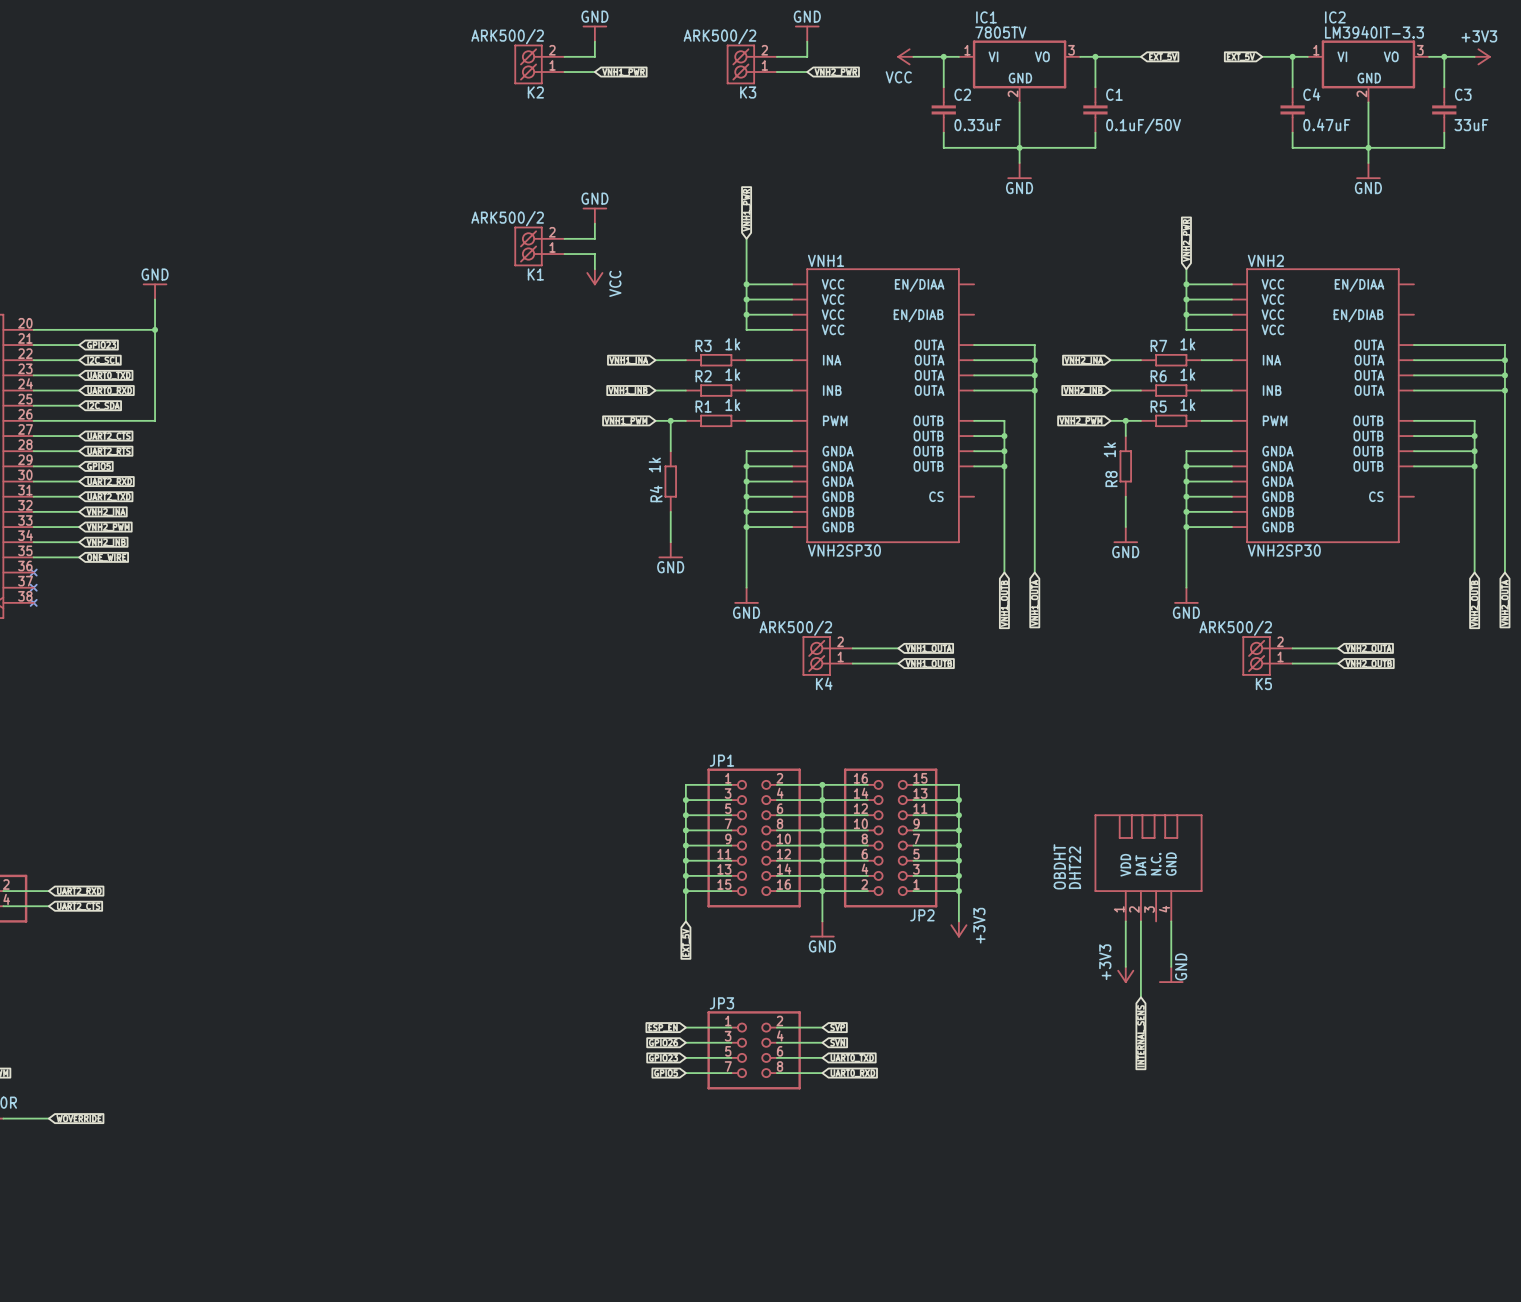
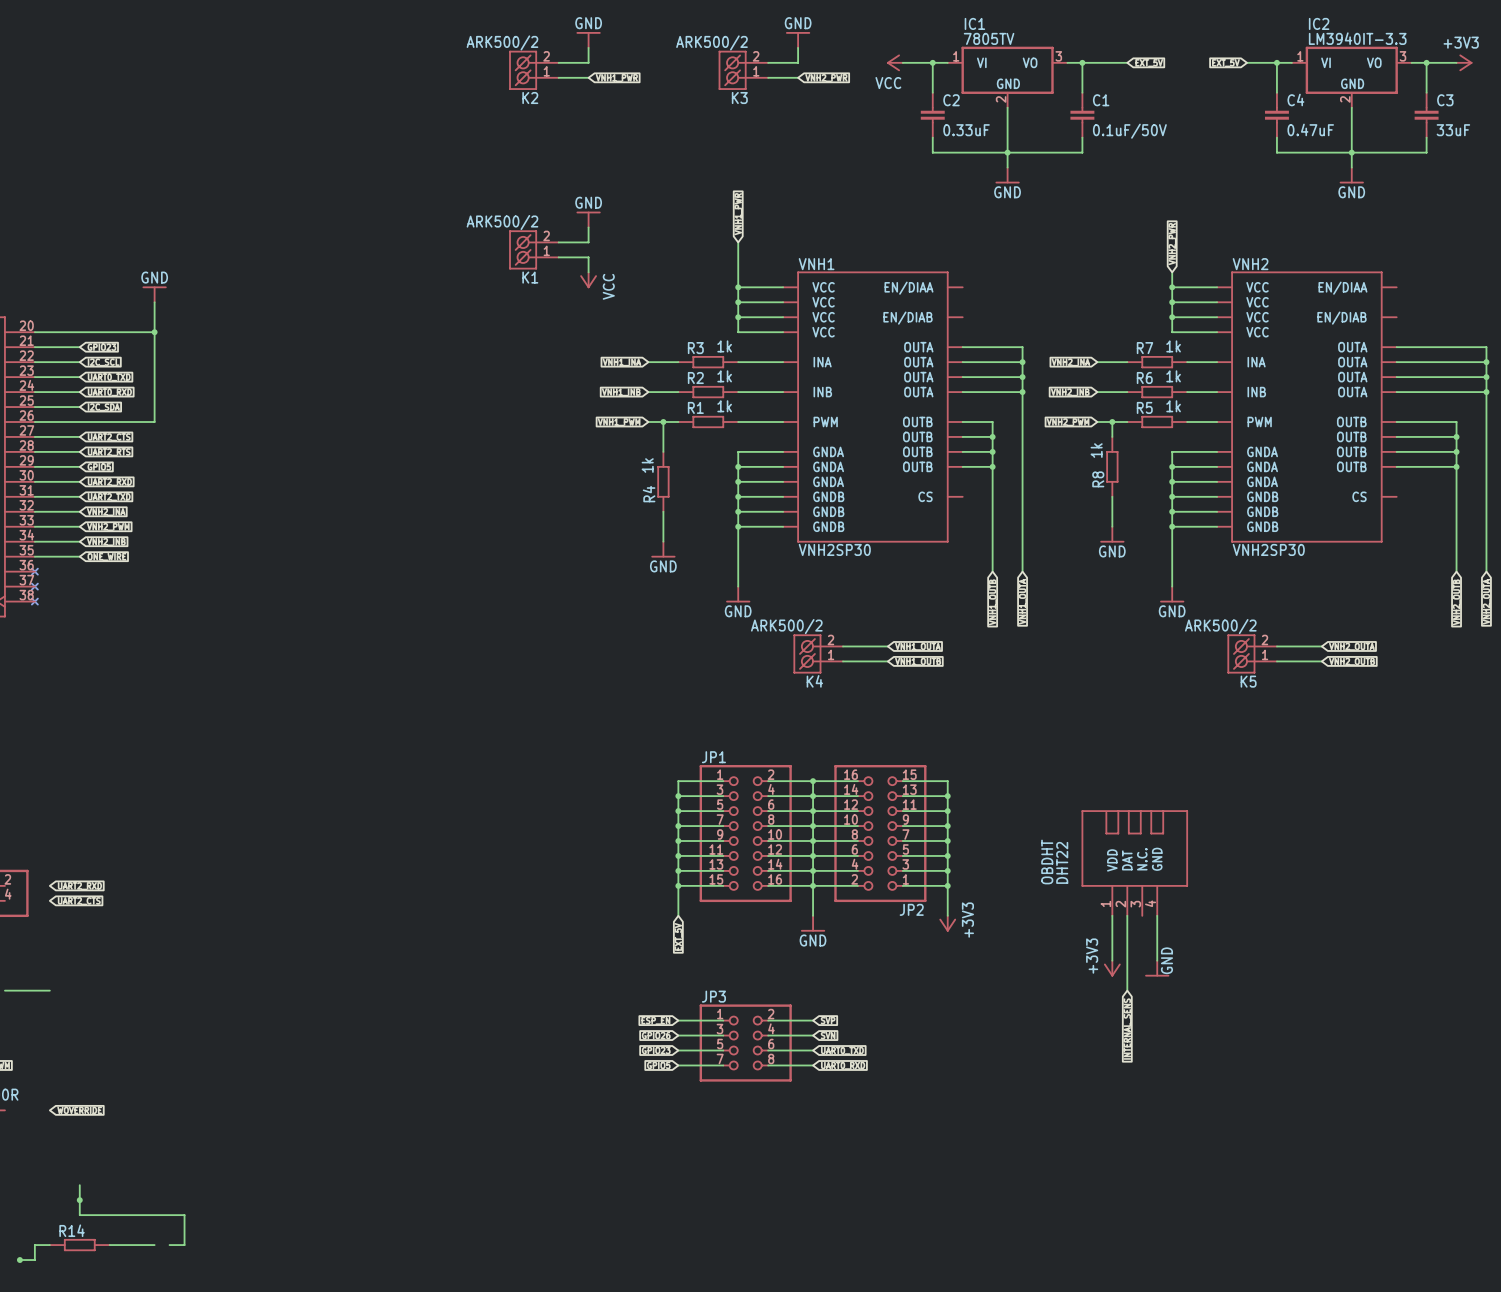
wire: (3, 891) (48, 891) -> none
wire: (3, 906) (48, 906) -> none
wire: (3, 1118) (48, 1118) -> (4, 990) (49, 990)
wire: none -> (79, 1185) (79, 1215) (184, 1215) (184, 1245) (169, 1245)
junction: none -> (79, 1200)
wire: none -> (49, 1245) (34, 1245) (34, 1260) (19, 1260)
R14: none -> (79, 1245)
wire: none -> (109, 1245) (154, 1245)
junction: none -> (19, 1260)

